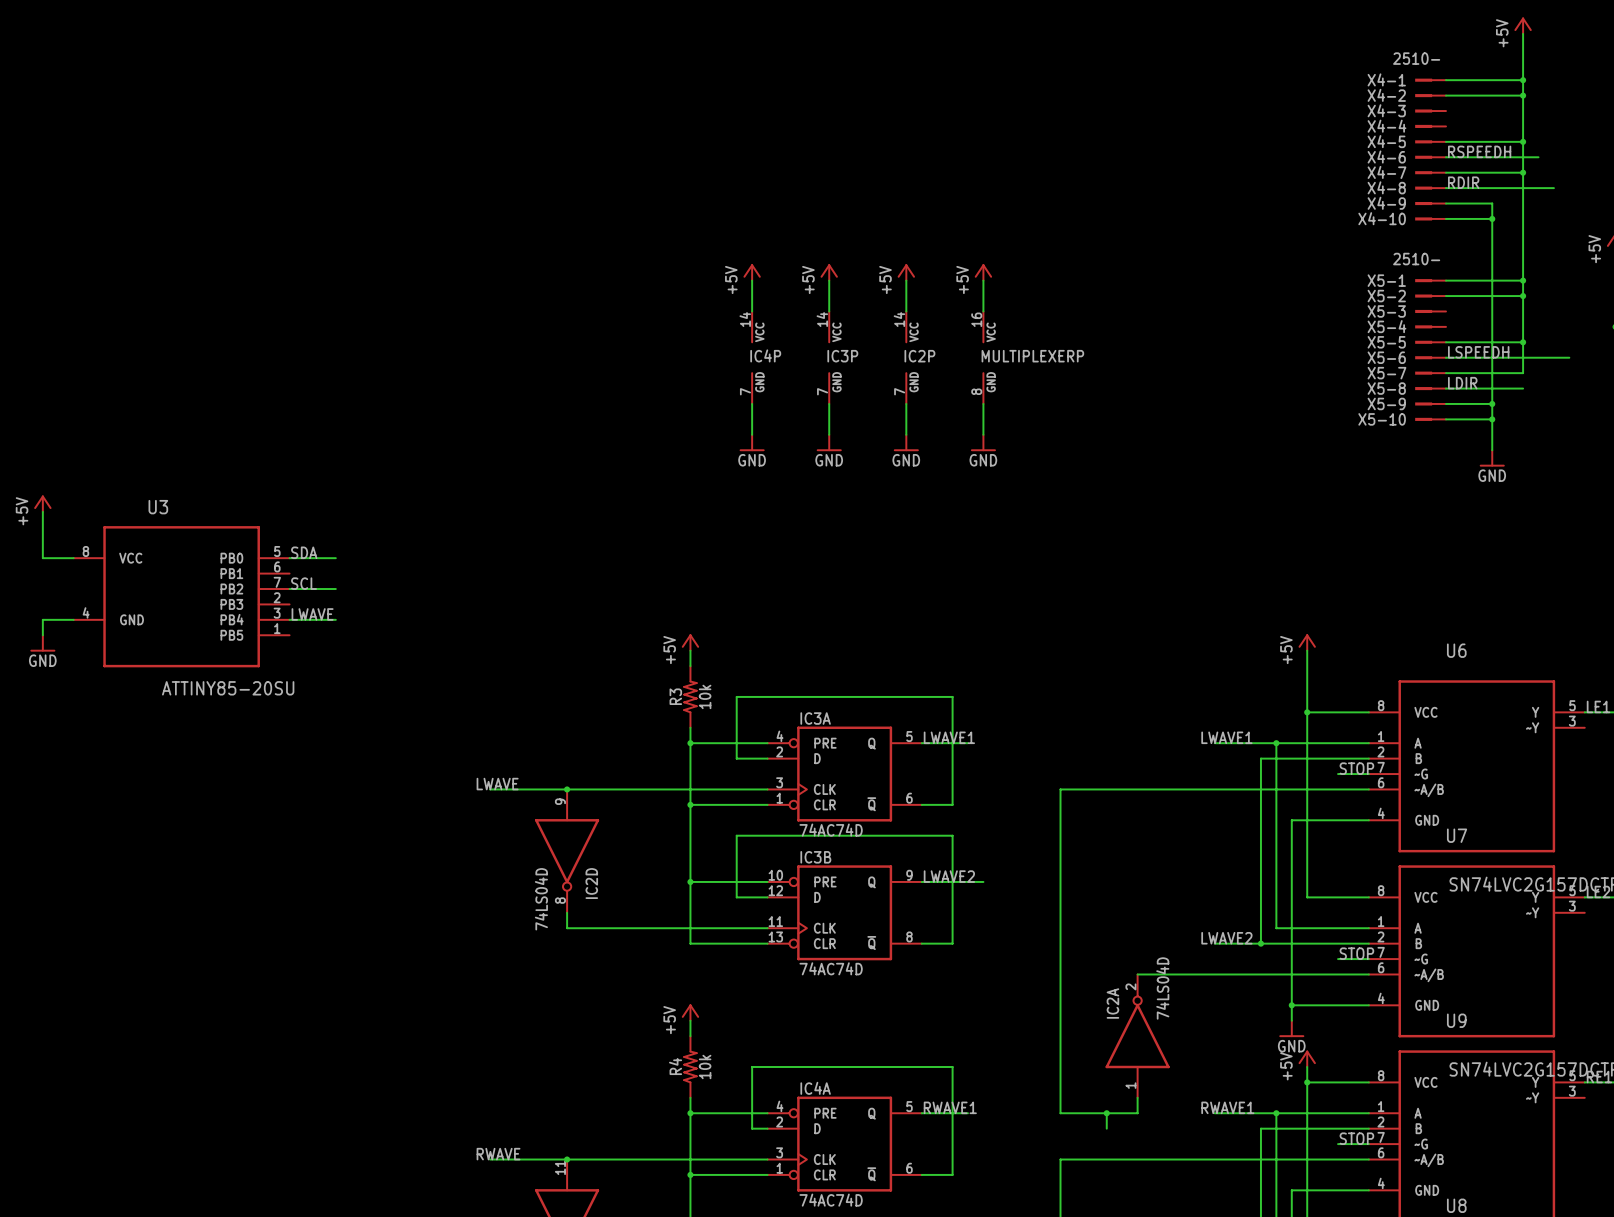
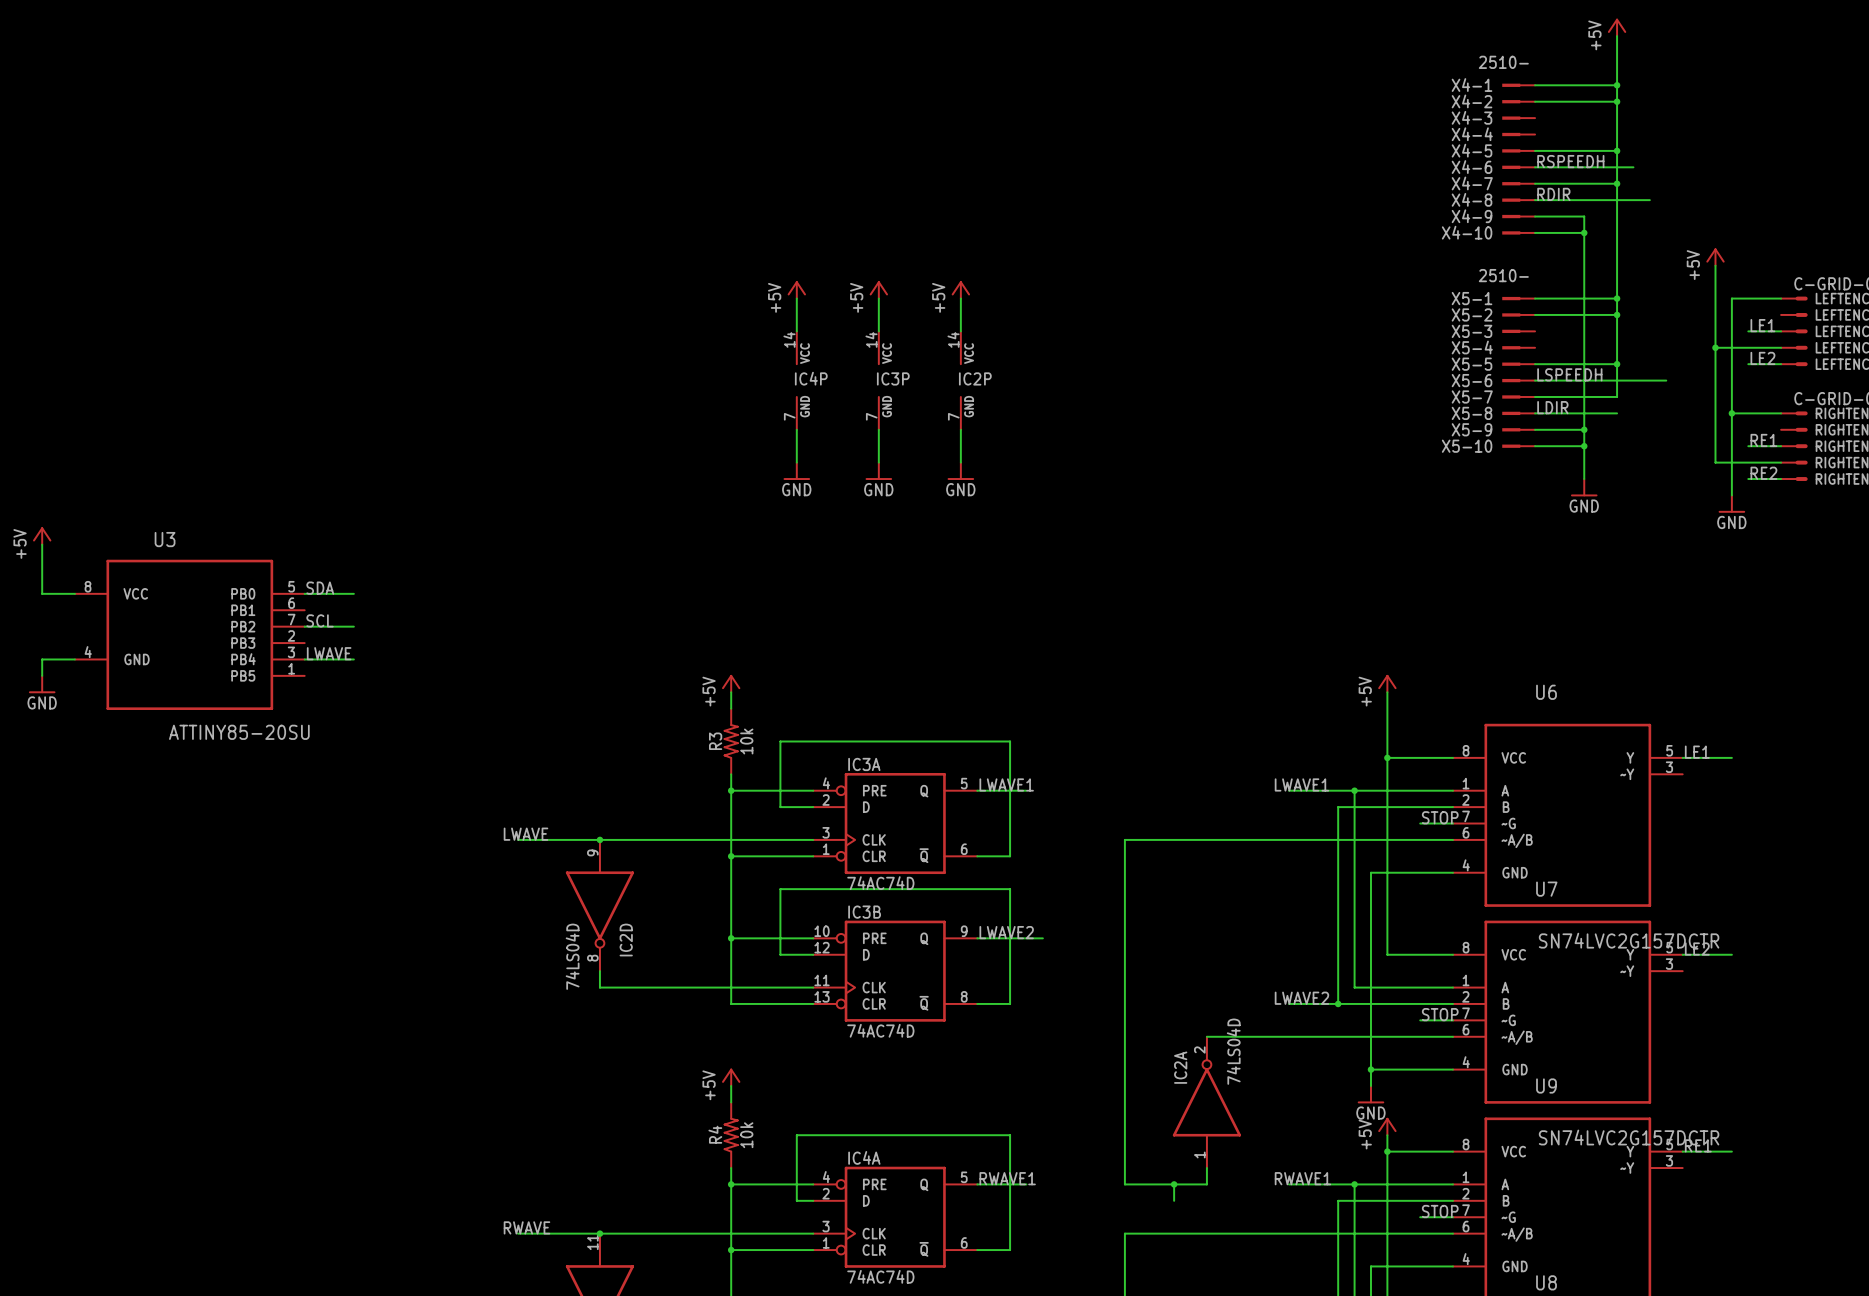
power symbol: +5V (983, 272) -> none
wire: (983, 280) (983, 311) -> none
MULTIPLEXERP: (983, 357) -> none
wire: (983, 403) (983, 434) -> none
power symbol: GND (983, 442) -> none

